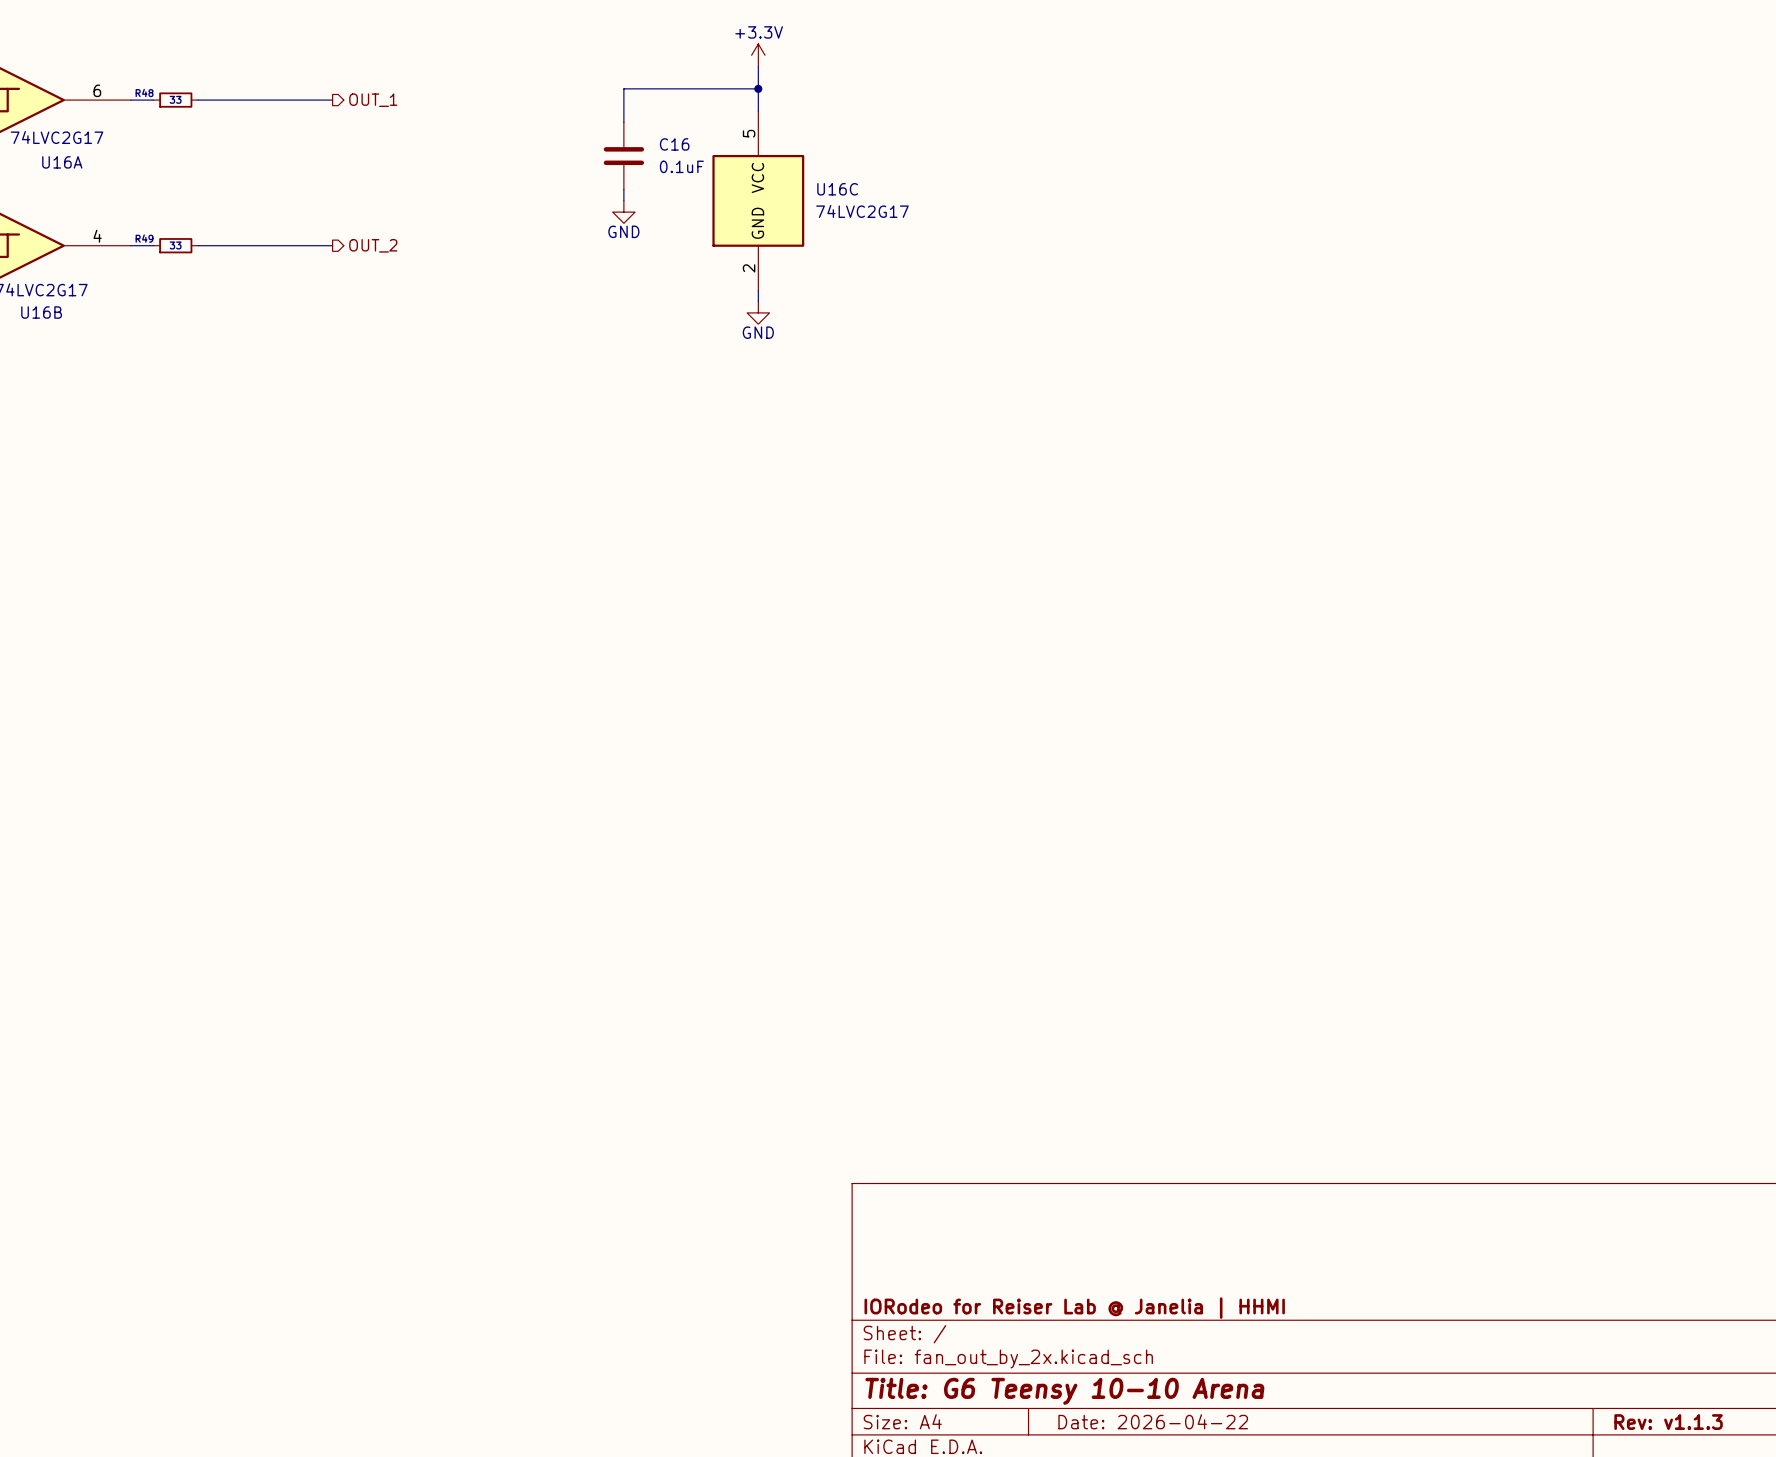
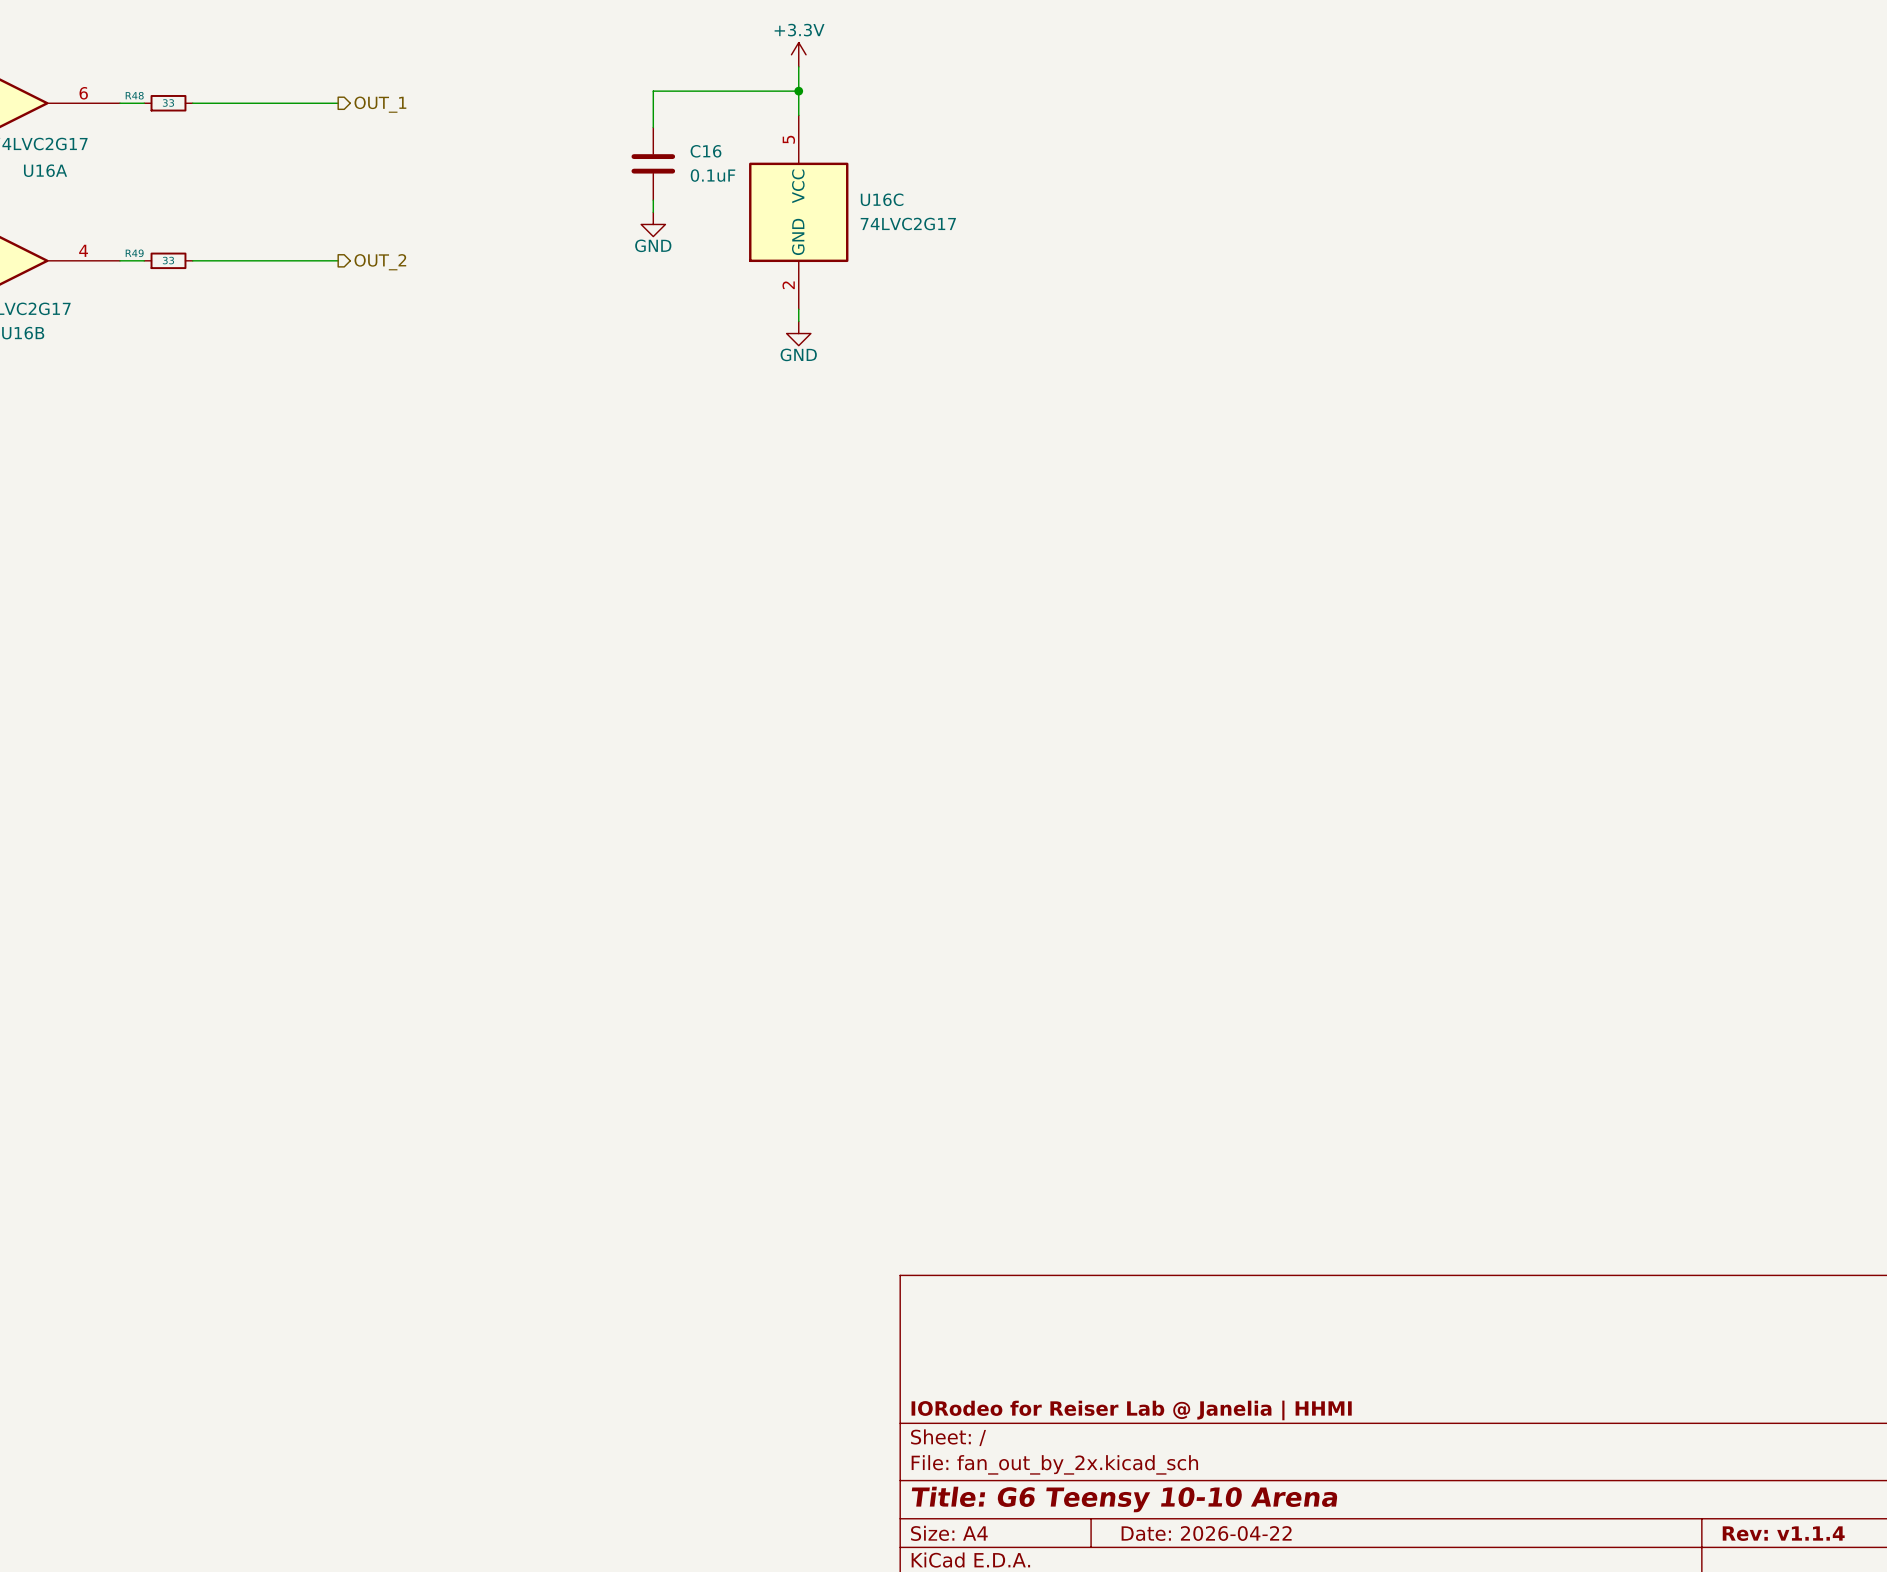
title block: Rev: v1.1.3 (1668, 1422) -> Rev: v1.1.4 (1783, 1533)

